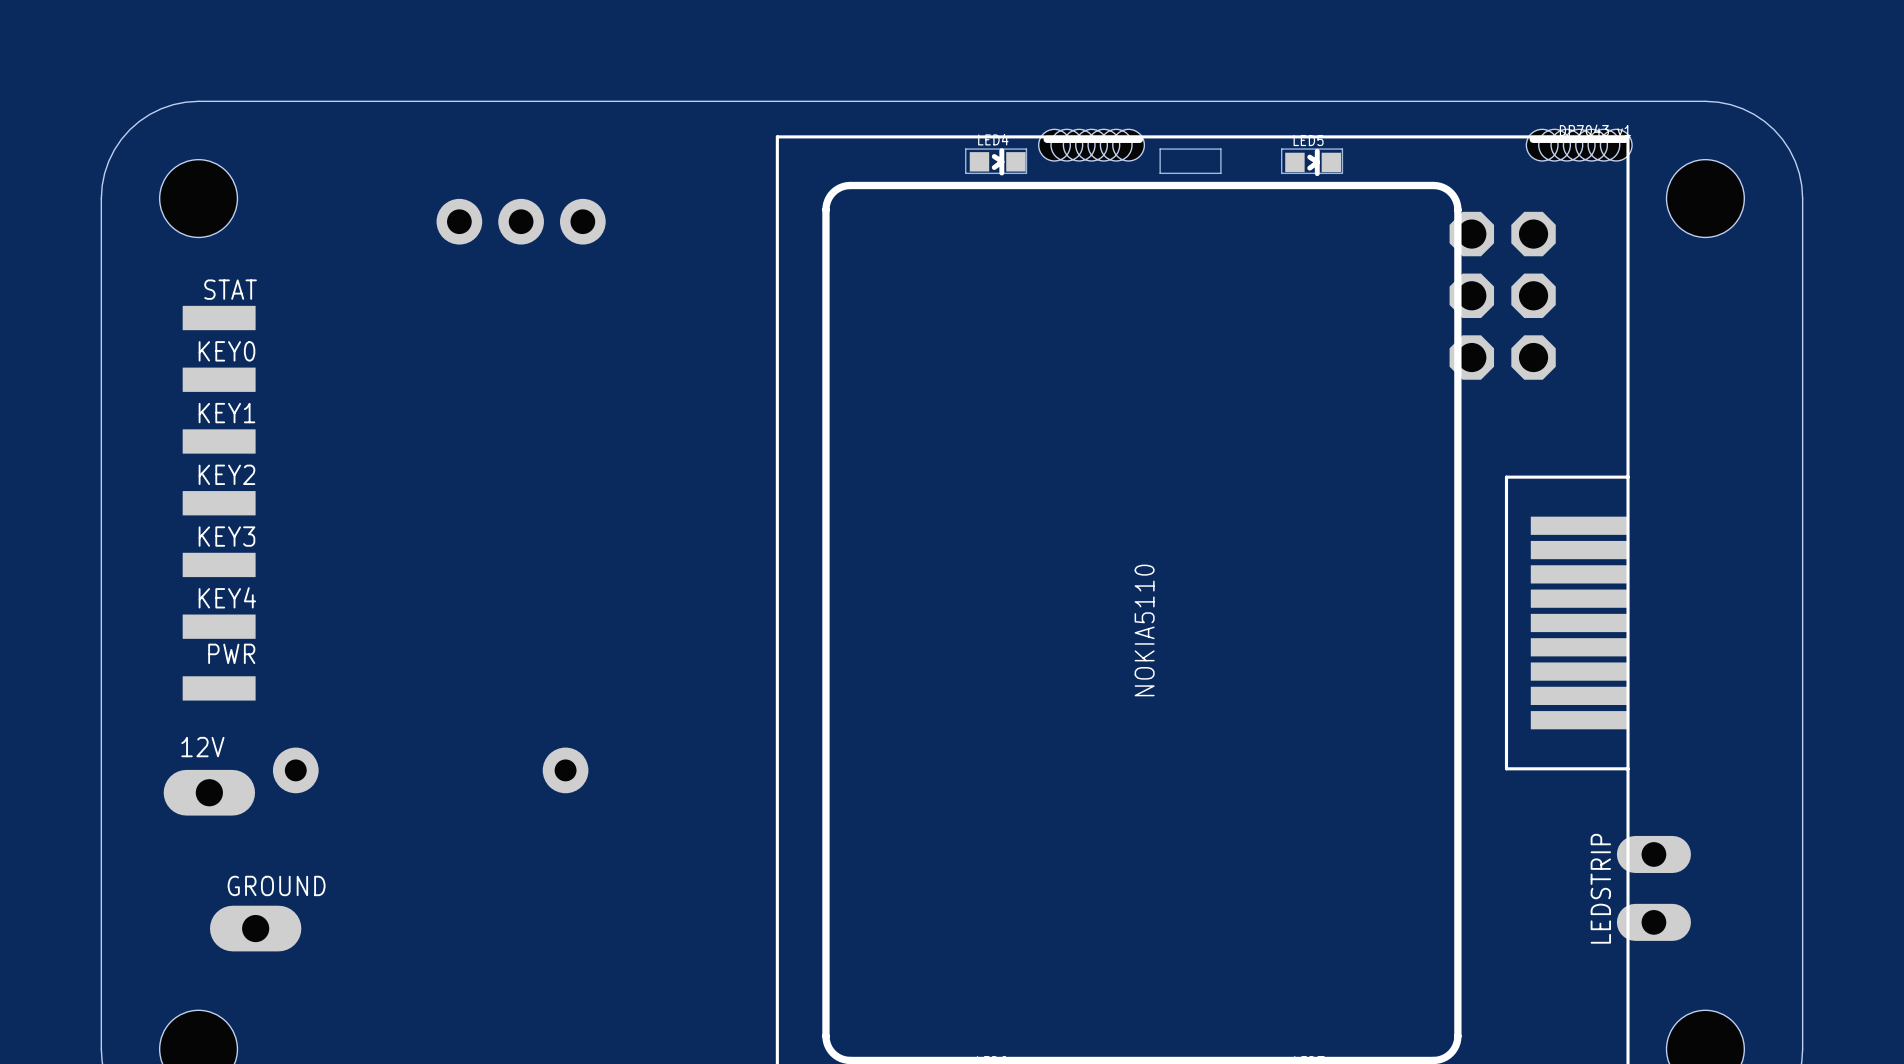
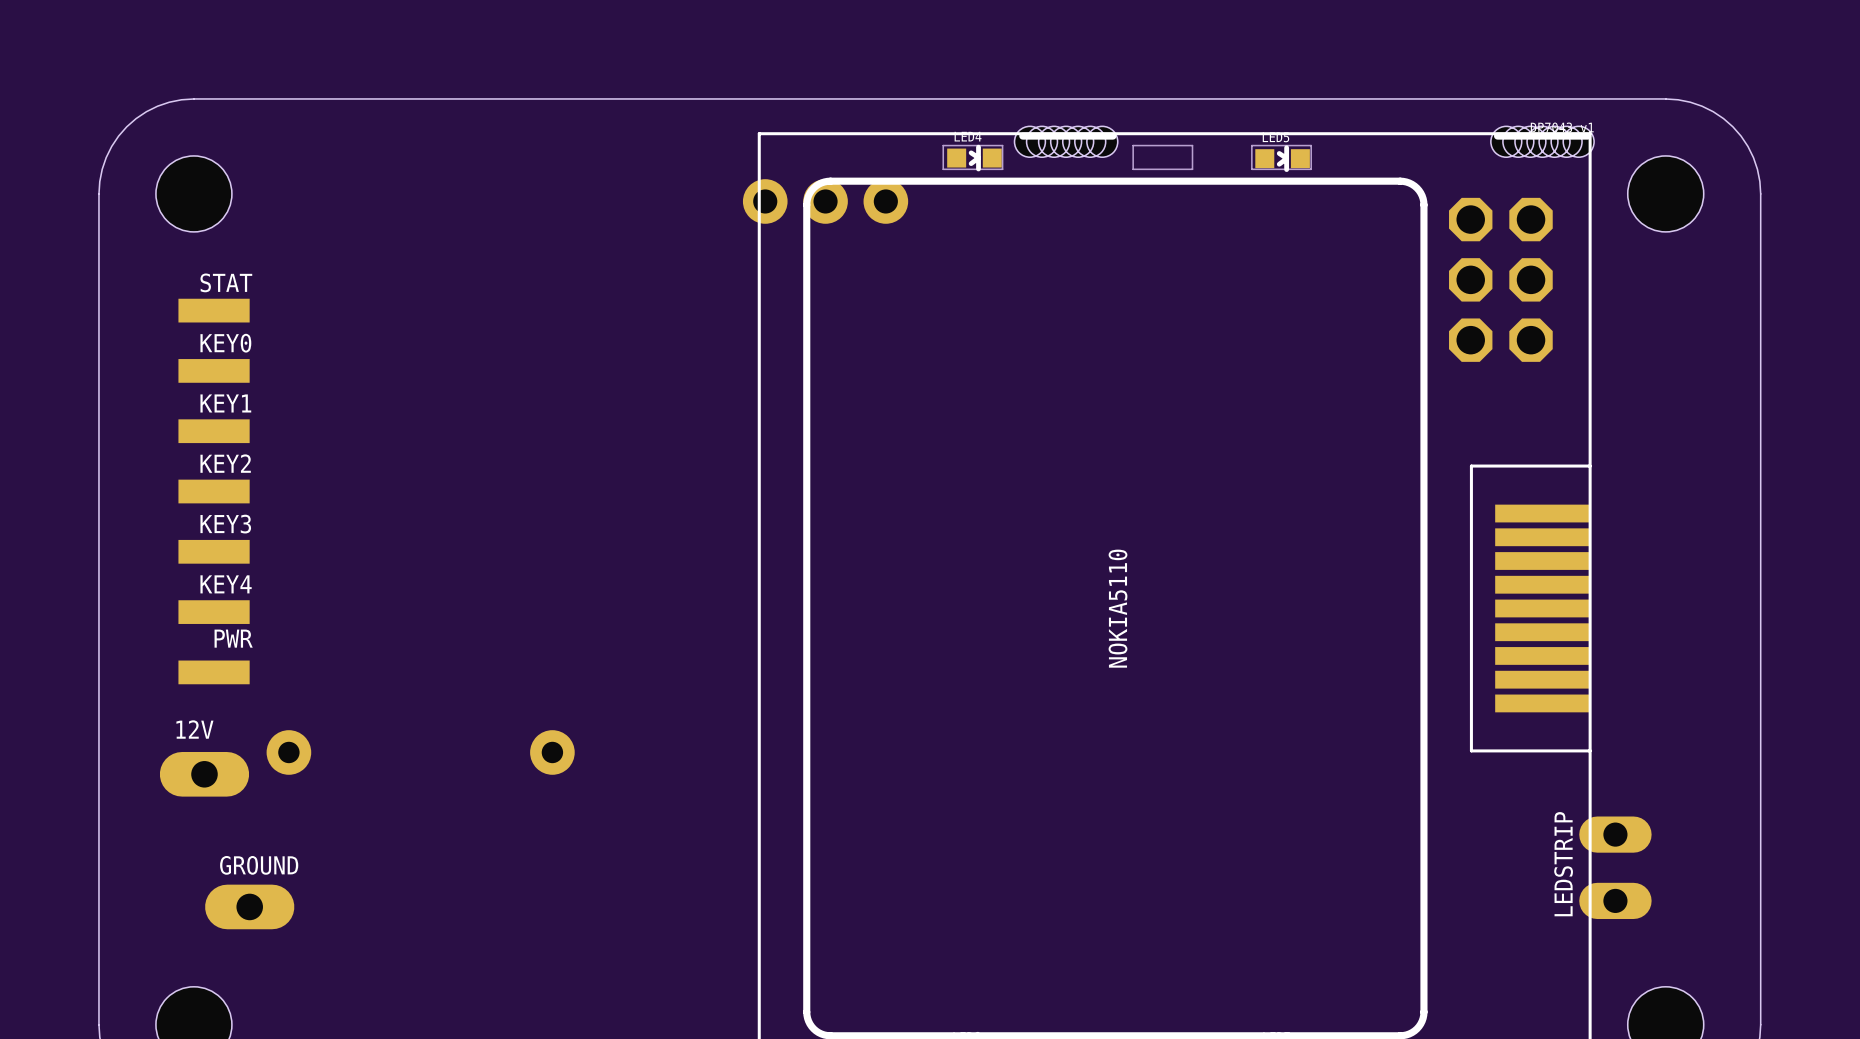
part position: (521, 221) -> (825, 201)
part position: (1502, 295) -> (1500, 279)

